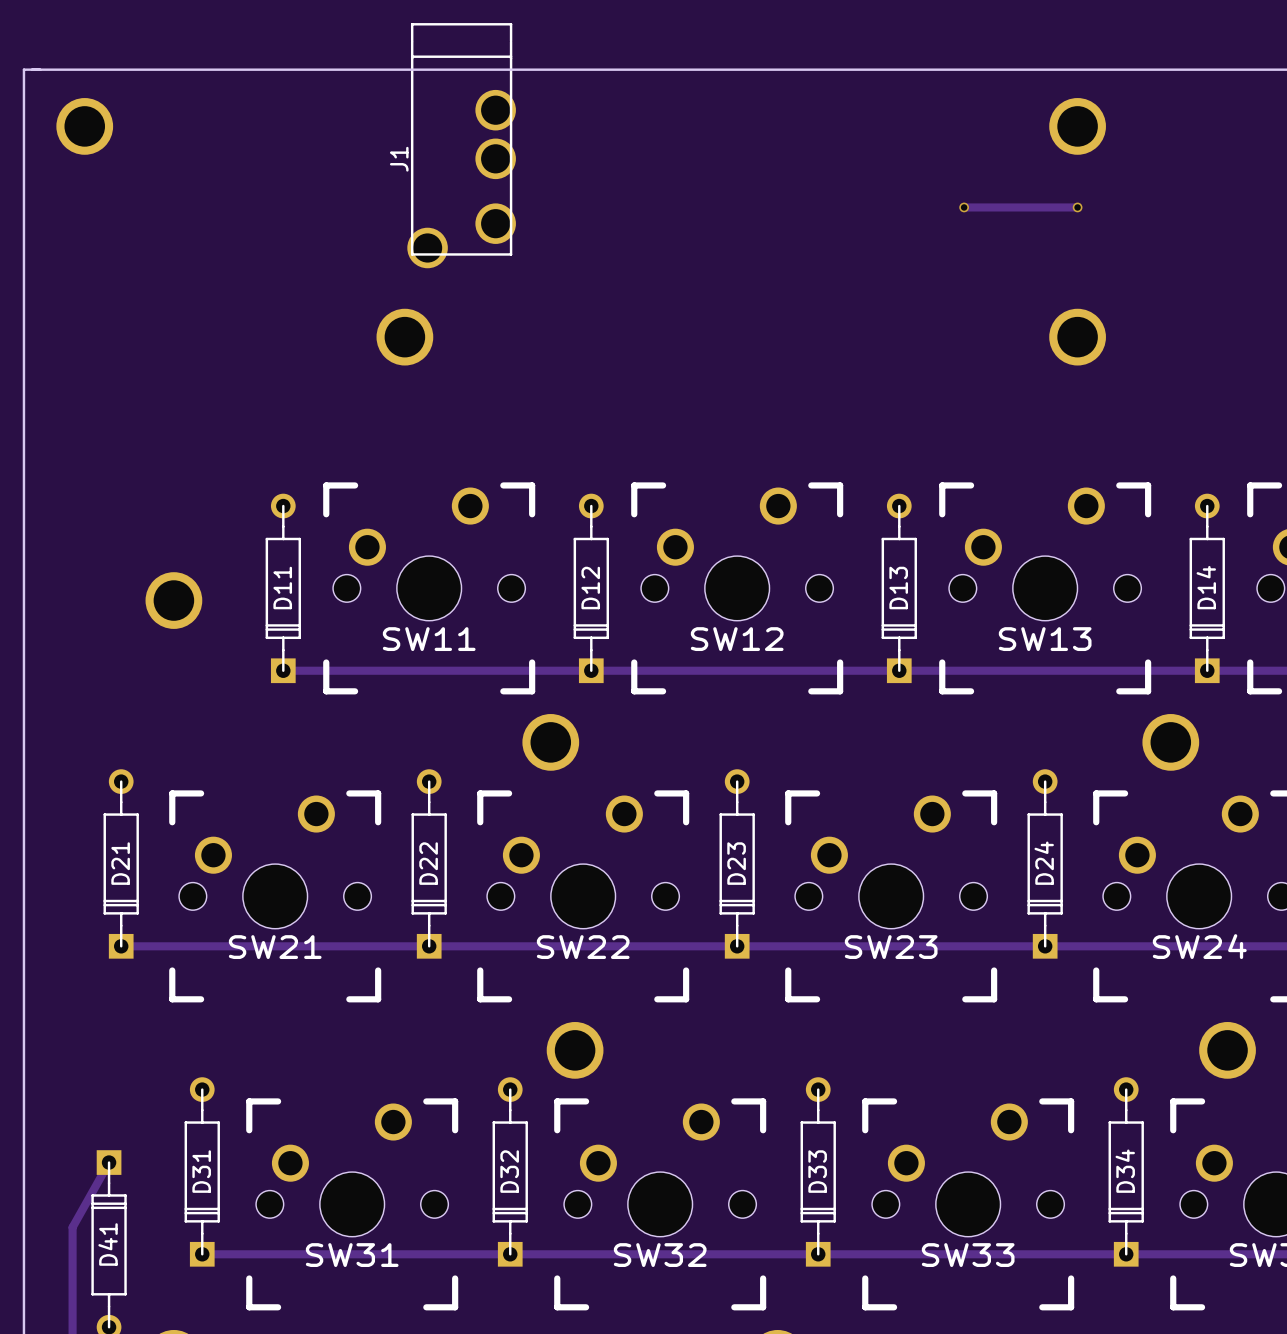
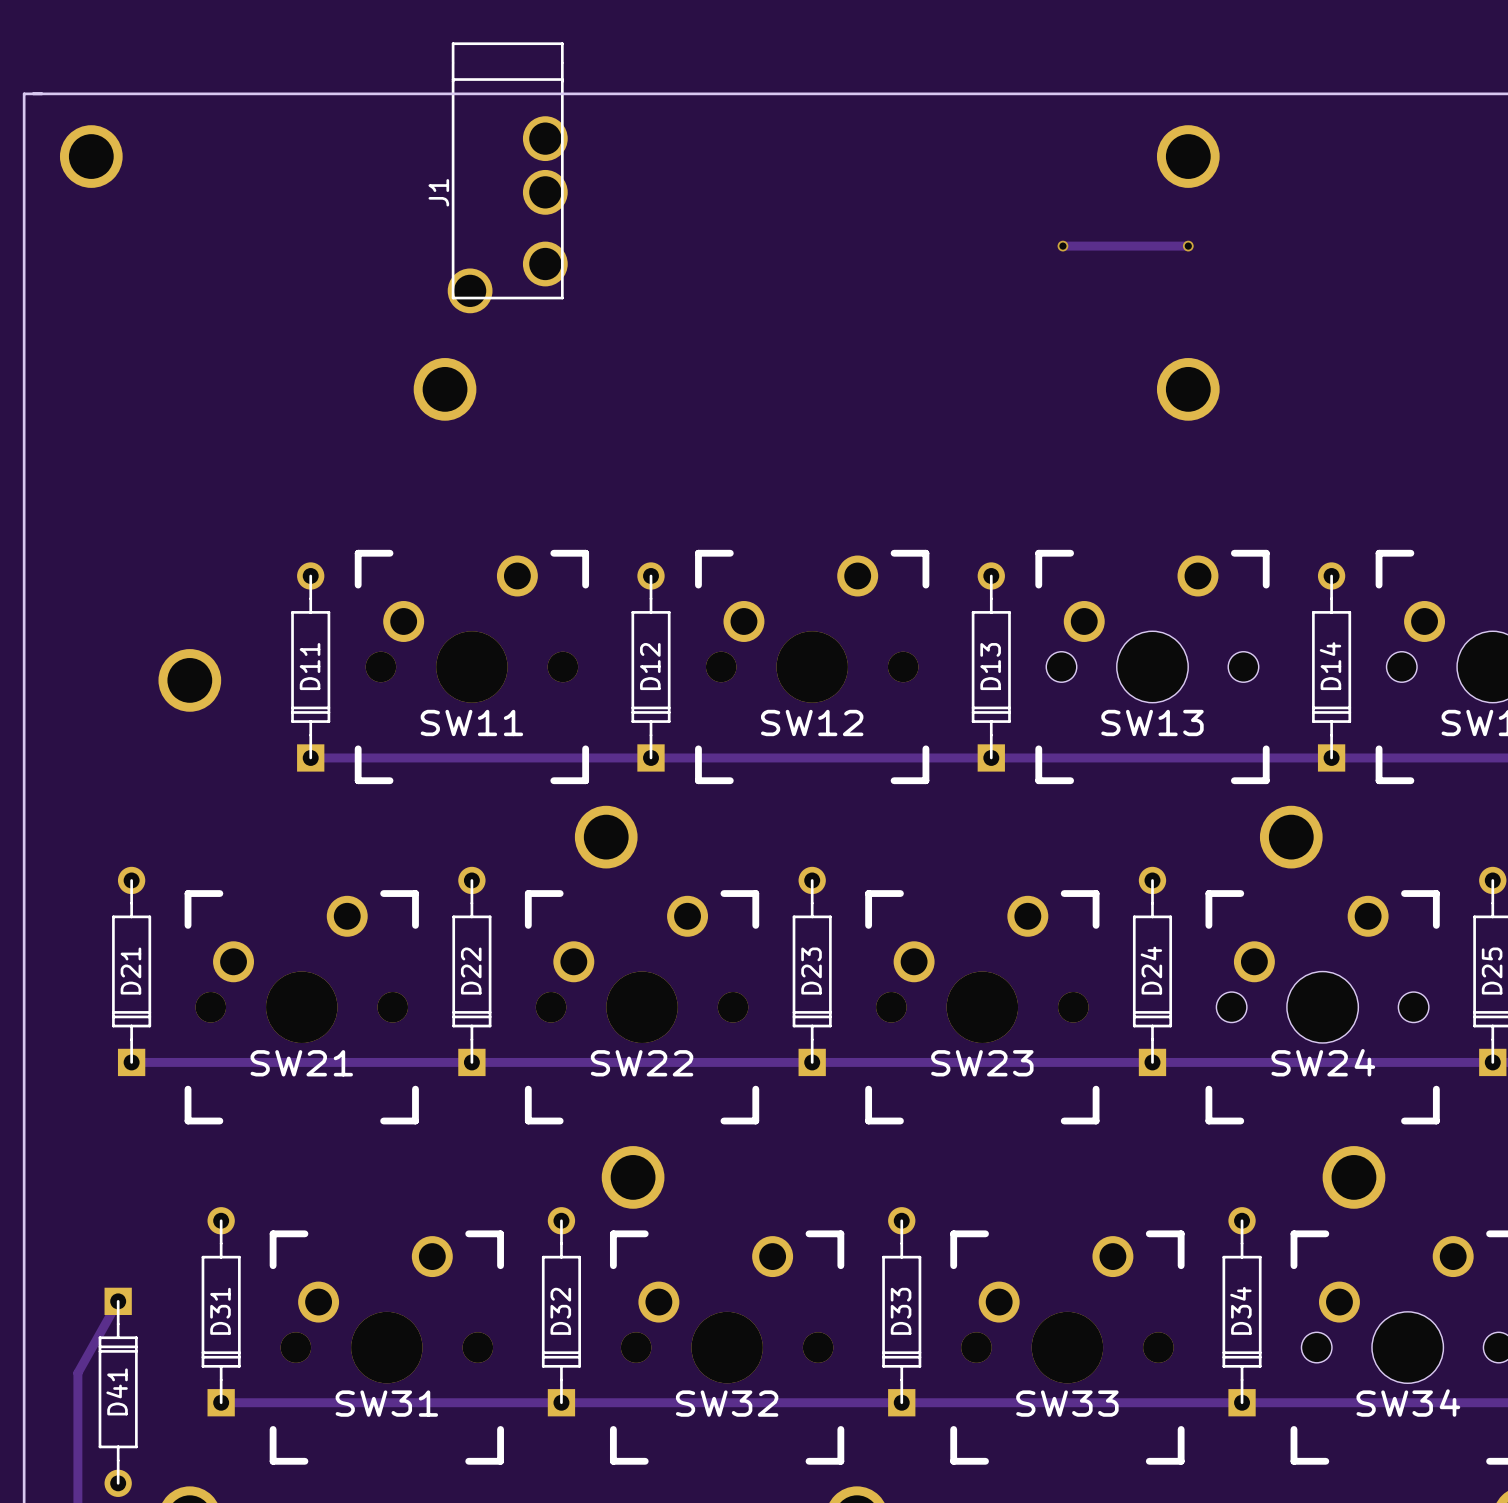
SW11 footprint: [323, 482, 536, 695] -> [354, 549, 590, 785]
SW12 footprint: [631, 482, 844, 695] -> [695, 549, 930, 785]
SW21 footprint: [169, 790, 382, 1003] -> [184, 890, 419, 1125]
SW22 footprint: [477, 790, 690, 1003] -> [524, 890, 760, 1125]
SW23 footprint: [785, 790, 998, 1003] -> [865, 890, 1100, 1125]
SW31 footprint: [246, 1098, 459, 1311] -> [269, 1230, 504, 1465]
SW32 footprint: [554, 1098, 767, 1311] -> [609, 1230, 845, 1465]
SW33 footprint: [862, 1098, 1075, 1311] -> [950, 1230, 1185, 1465]

